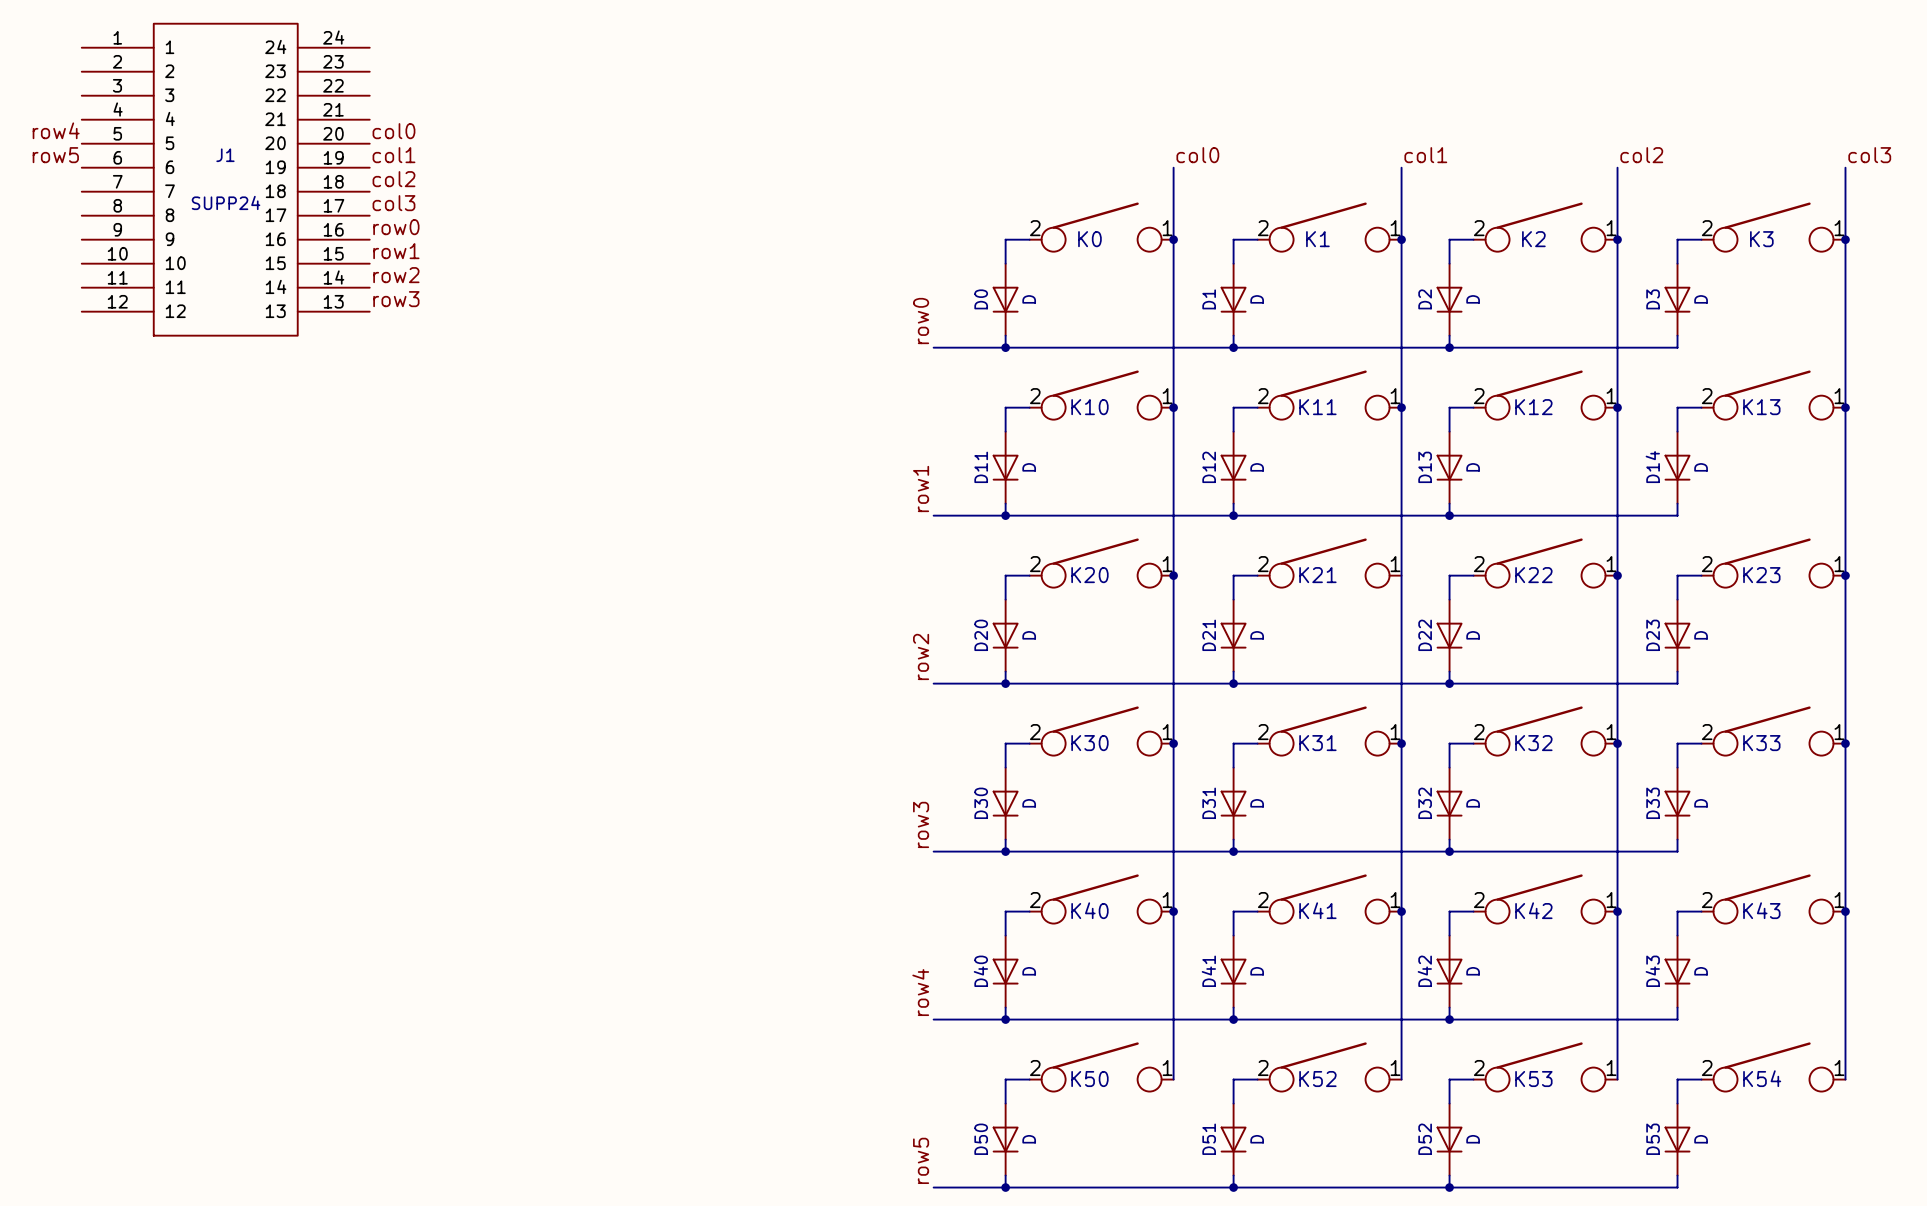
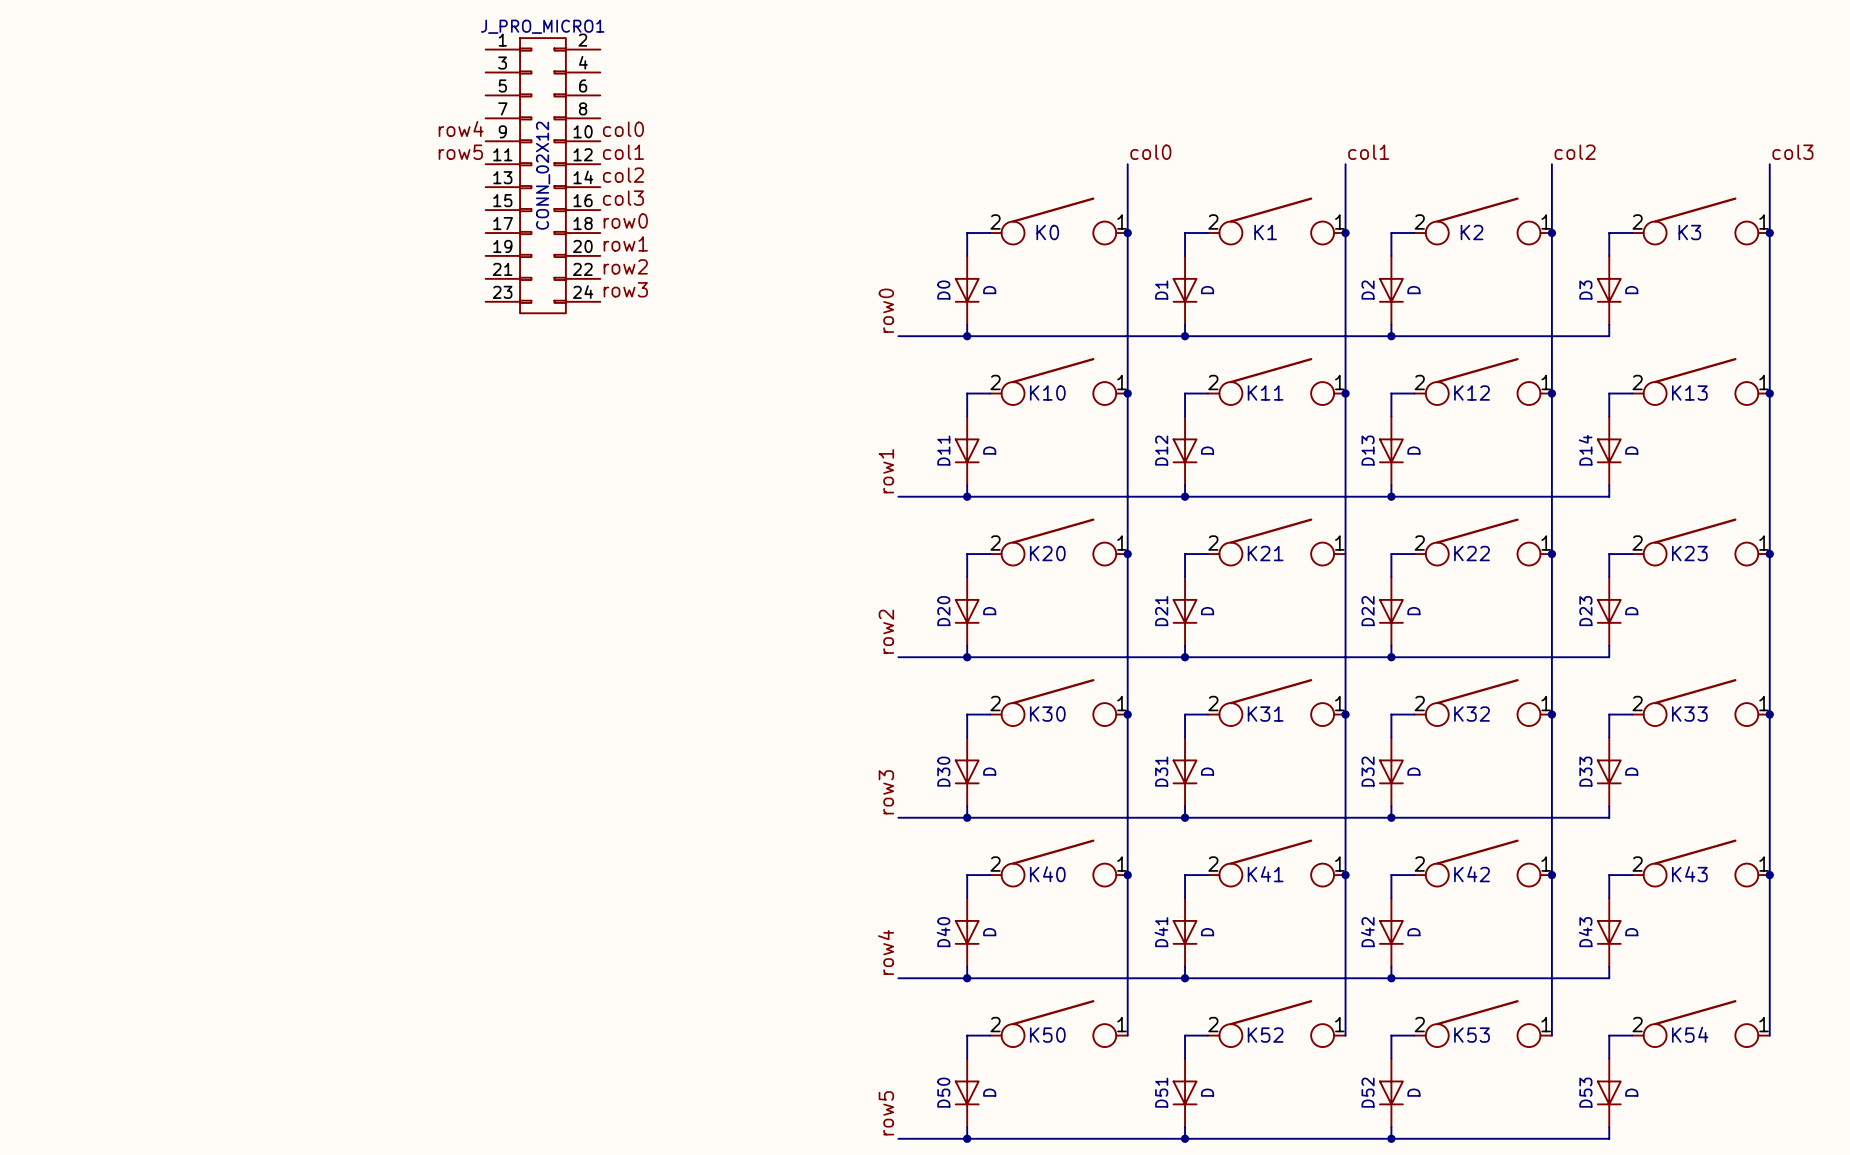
label: row4 (56, 130) -> none
label: none -> row4 (461, 128)
label: col0 (393, 131) -> none
label: none -> col0 (623, 129)
label: row5 (55, 155) -> none
label: col1 (393, 155) -> none
label: none -> row5 (460, 152)
label: none -> col1 (623, 152)
J1: SUPP24 (225, 179) -> none
label: col2 (393, 179) -> none
J_PRO_MICRO1: none -> CONN_02X12 (542, 175)
label: none -> col2 (623, 175)
label: col3 (393, 203) -> none
label: none -> col3 (623, 198)
label: row0 (396, 227) -> none
label: none -> row0 (625, 221)
label: row1 (396, 251) -> none
label: none -> row1 (625, 243)
label: row2 (396, 275) -> none
label: none -> row2 (625, 266)
label: row3 (396, 299) -> none
label: none -> row3 (625, 289)

